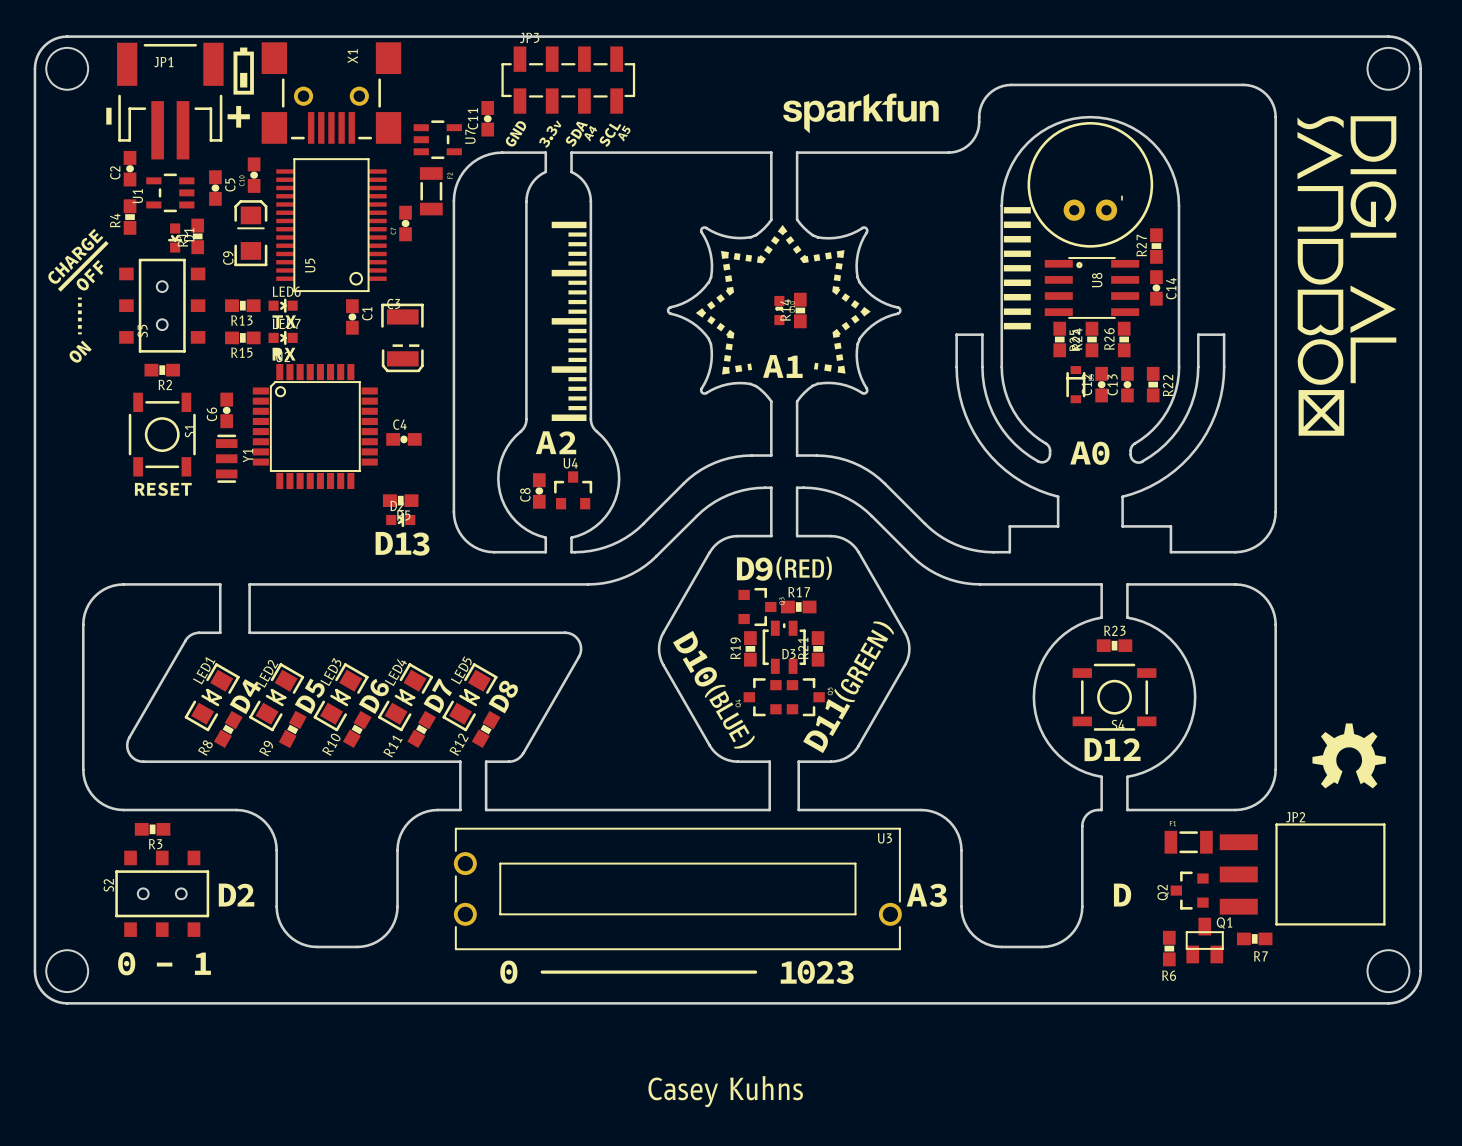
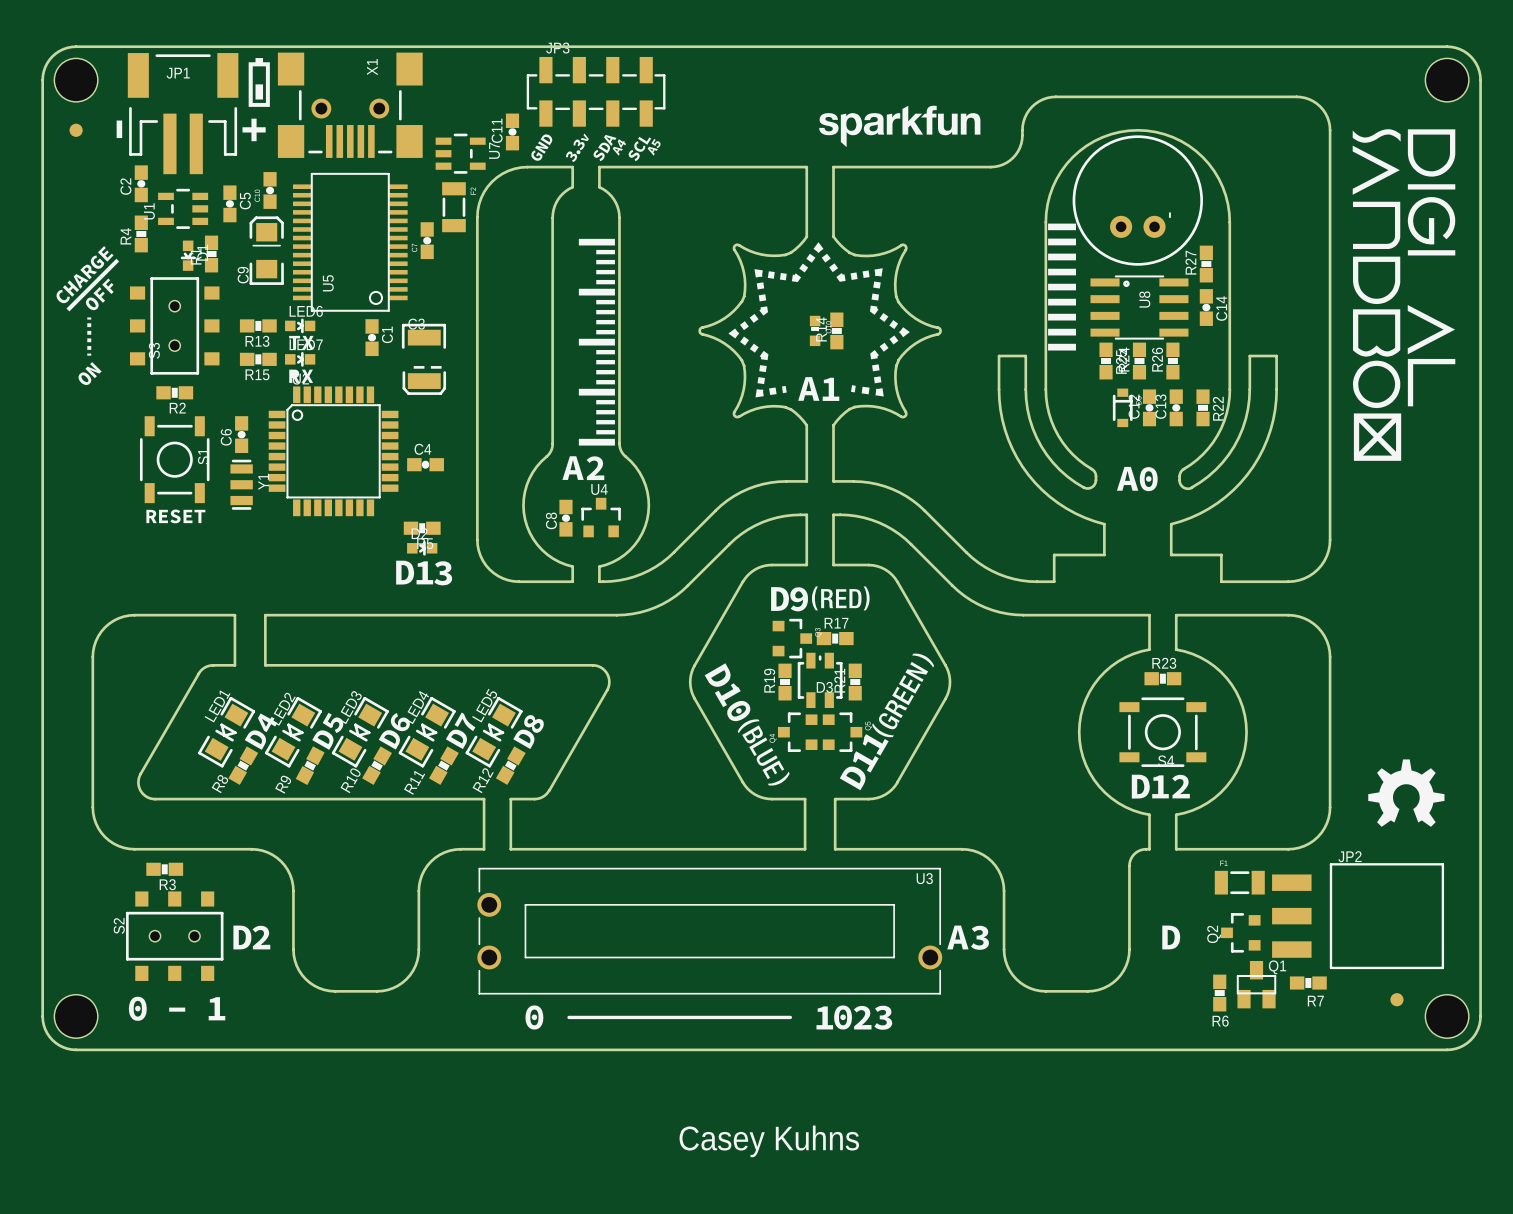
part: none -> (76, 130)
part: none -> (1396, 999)

